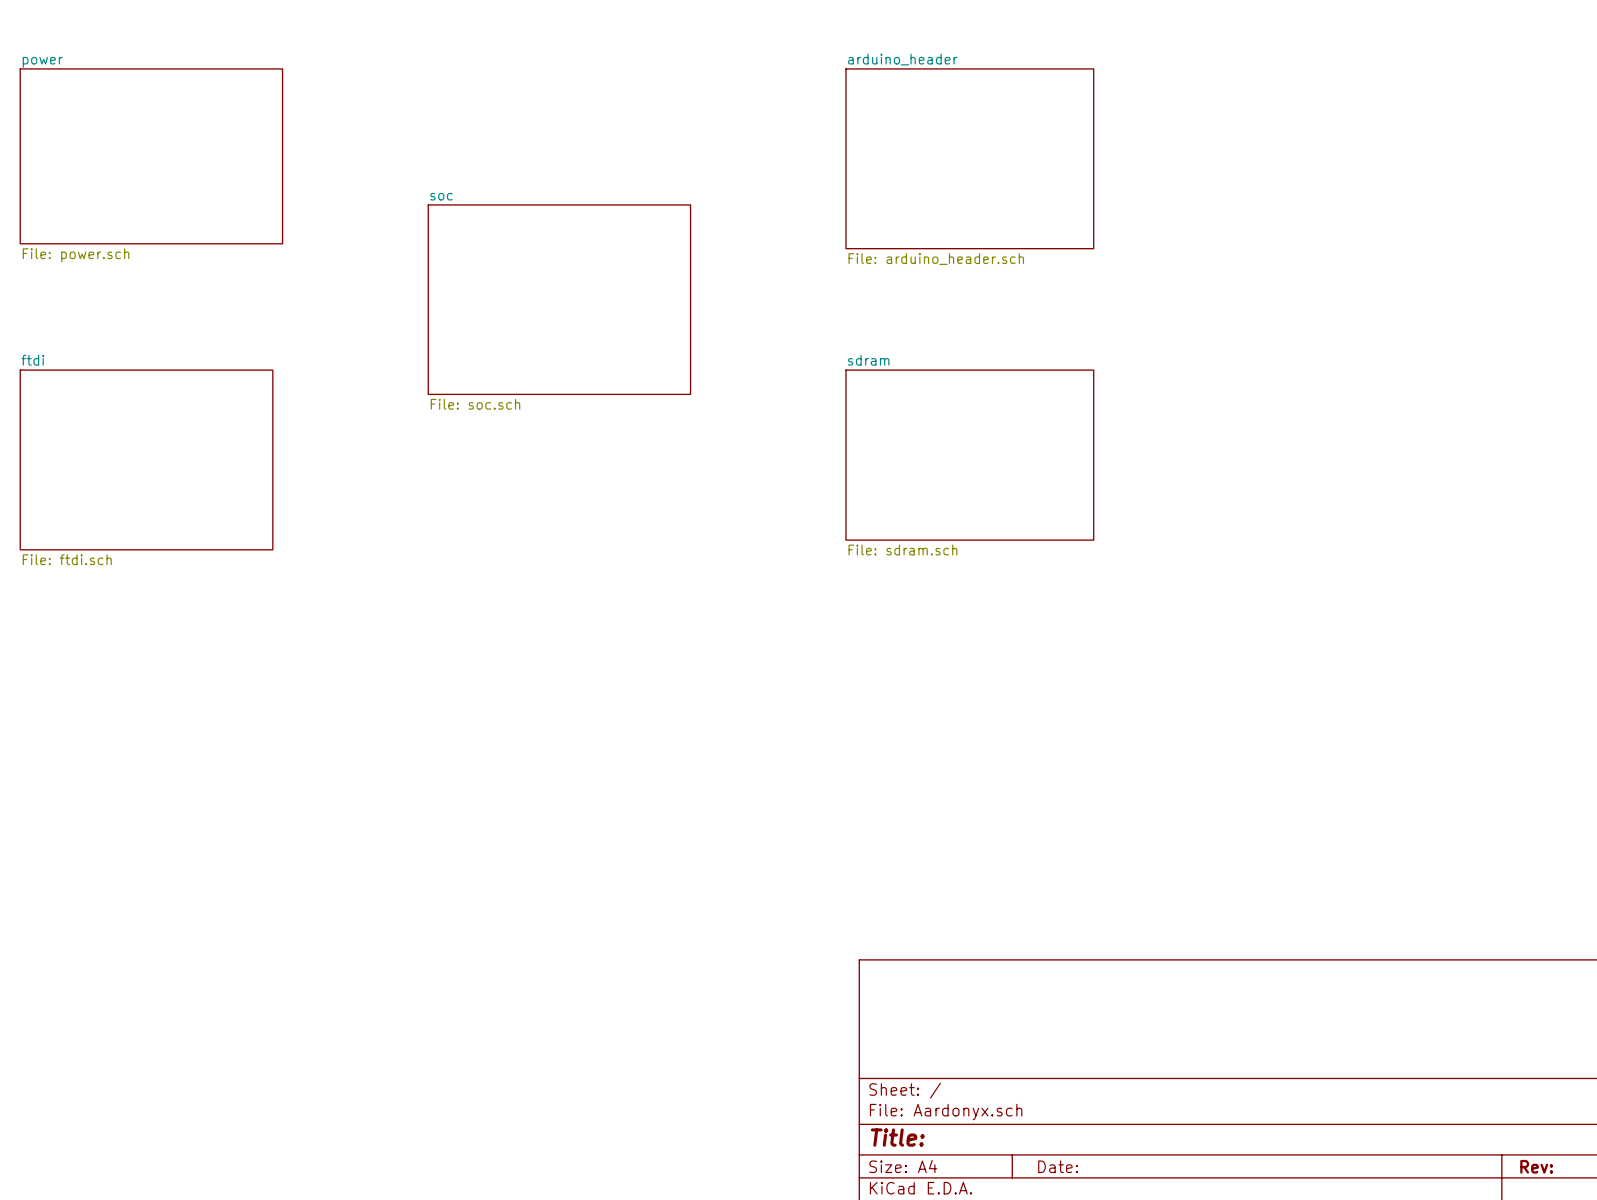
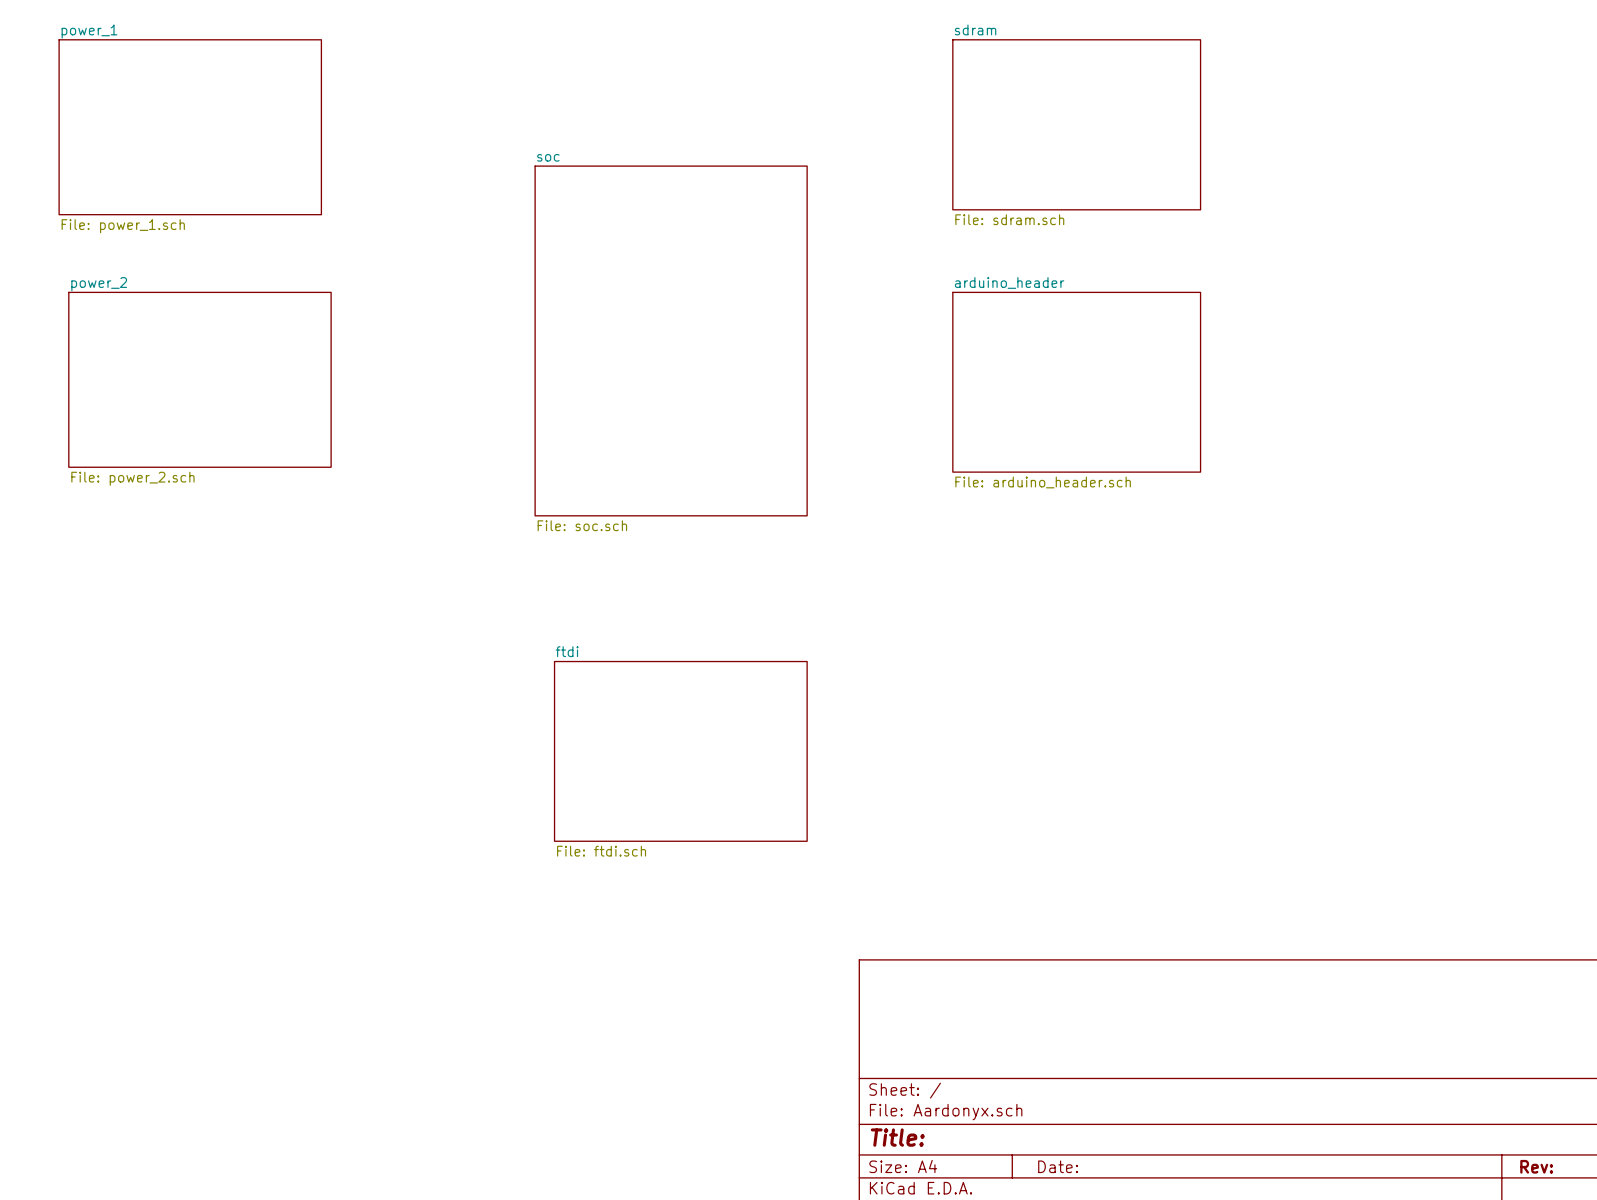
sheet sdram: none -> File: sdram.sch (1076, 124)
sheet power_1: none -> File: power_1.sch (190, 127)
sheet power: File: power.sch (151, 156) -> none
sheet arduino_header: File: arduino_header.sch (969, 158) -> none
sheet soc: File: soc.sch (559, 299) -> none
sheet soc: none -> File: soc.sch (671, 340)
sheet power_2: none -> File: power_2.sch (199, 379)
sheet arduino_header: none -> File: arduino_header.sch (1076, 382)
sheet sdram: File: sdram.sch (969, 455) -> none
sheet ftdi: File: ftdi.sch (146, 459) -> none
sheet ftdi: none -> File: ftdi.sch (680, 751)

